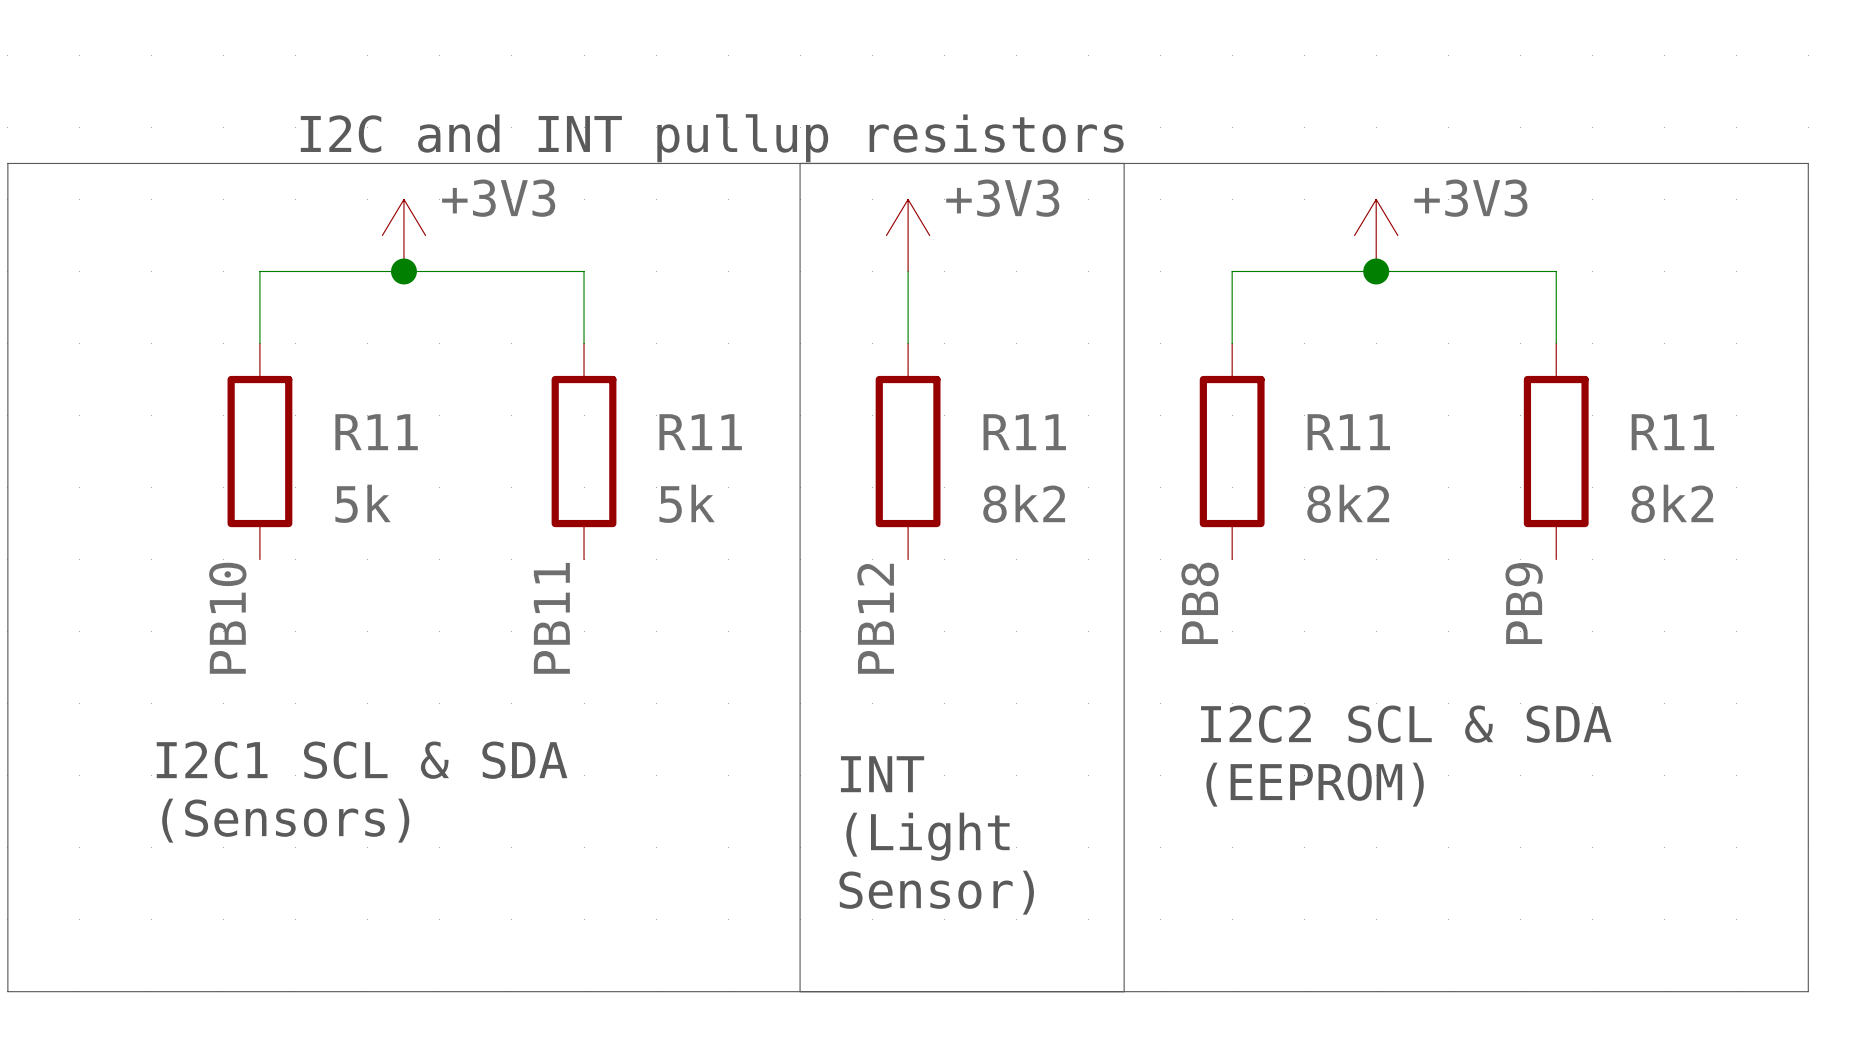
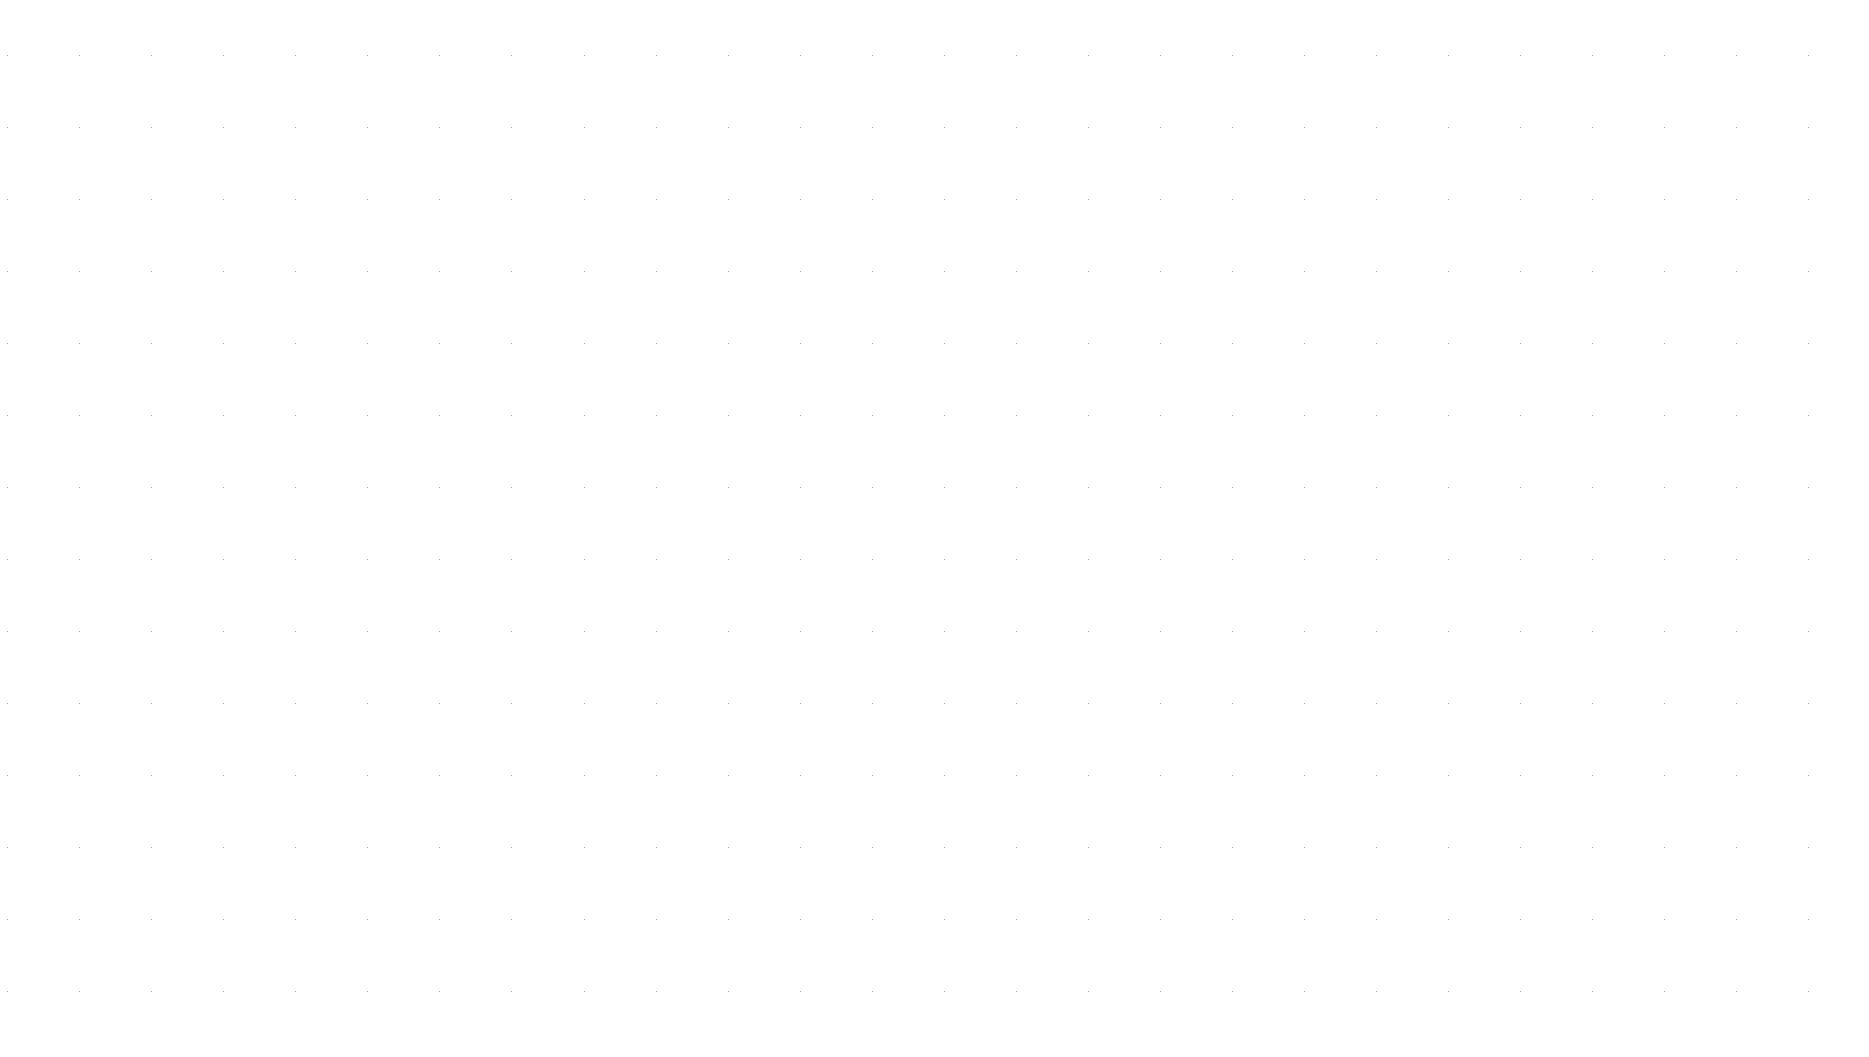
text: I2C and INT pullup resistors (712, 138) -> none
line: (7, 163) (1808, 163) (1808, 991) (7, 991) (7, 163) -> none
line: (800, 163) (800, 991) -> none
line: (1124, 163) (1124, 991) -> none
power symbol: +3V3 (403, 235) -> none
power symbol: +3V3 (908, 235) -> none
power symbol: +3V3 (1376, 235) -> none
junction: (403, 271) -> none
wire: (908, 271) (908, 343) -> none
junction: (1376, 271) -> none
wire: (259, 343) (259, 271) (584, 271) (584, 343) -> none
wire: (1232, 343) (1232, 271) (1556, 271) (1556, 343) -> none
R11: 5k (259, 451) -> none
R11: 5k (584, 451) -> none
R11: 8k2 (908, 451) -> none
R11: 8k2 (1232, 451) -> none
R11: 8k2 (1556, 451) -> none
label: PB8 (1200, 603) -> none
label: PB9 (1524, 603) -> none
label: PB10 (227, 618) -> none
label: PB11 (551, 618) -> none
label: PB12 (875, 618) -> none
text: I2C2 SCL & SDA (1406, 724) -> none
text: I2C1 SCL & SDA (362, 760) -> none
text: INT (882, 774) -> none
text: (EEPROM) (1315, 784) -> none
text: (Sensors) (285, 820) -> none
text: (Light (927, 836) -> none
text: Sensor) (936, 892) -> none

